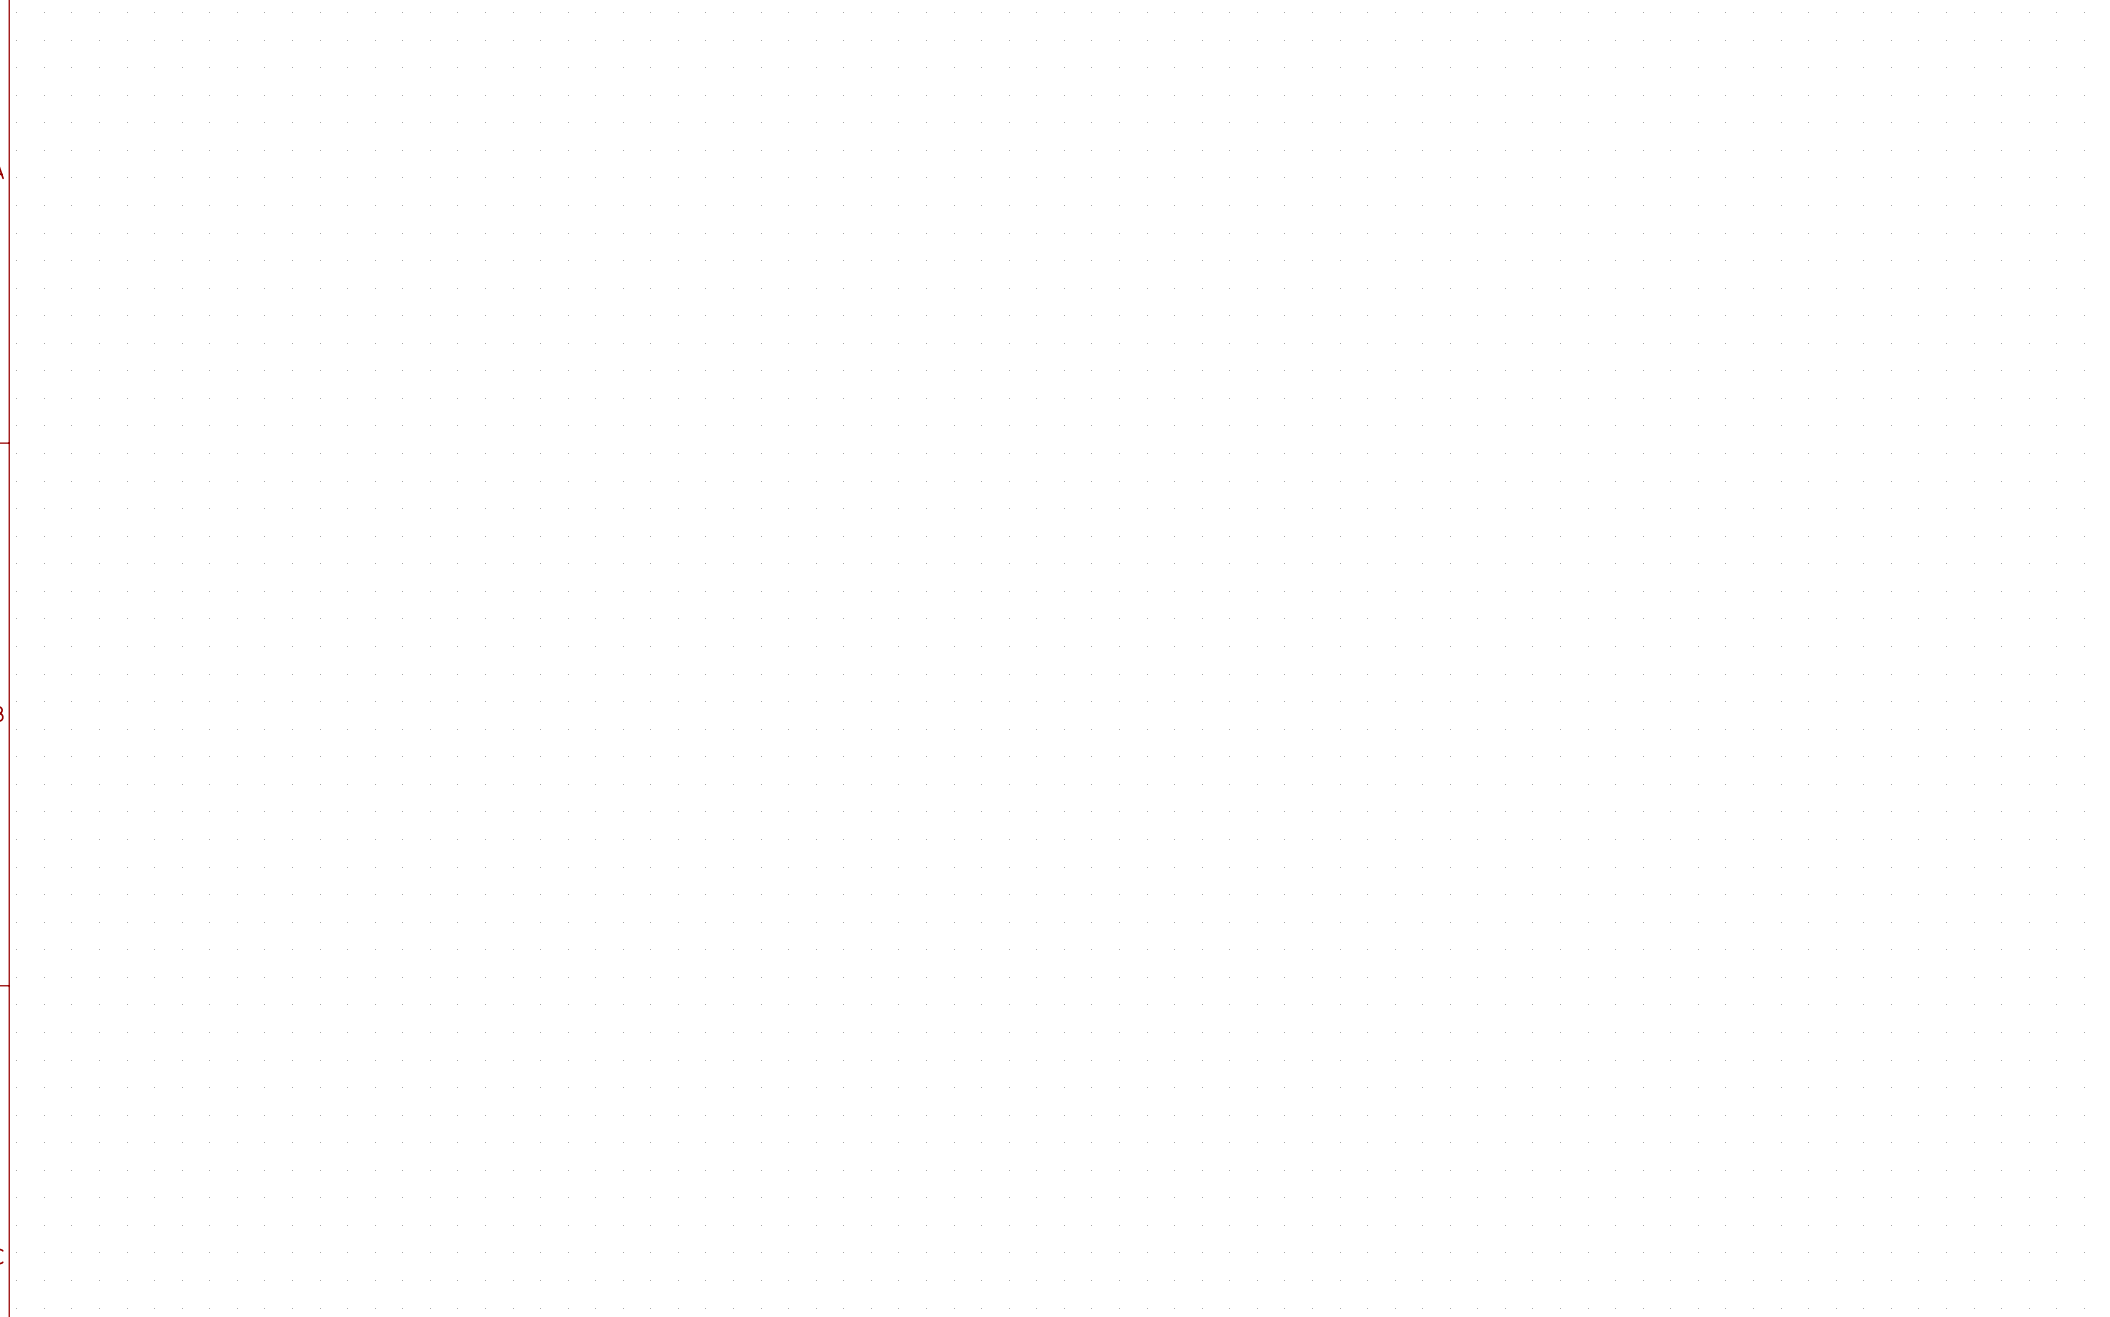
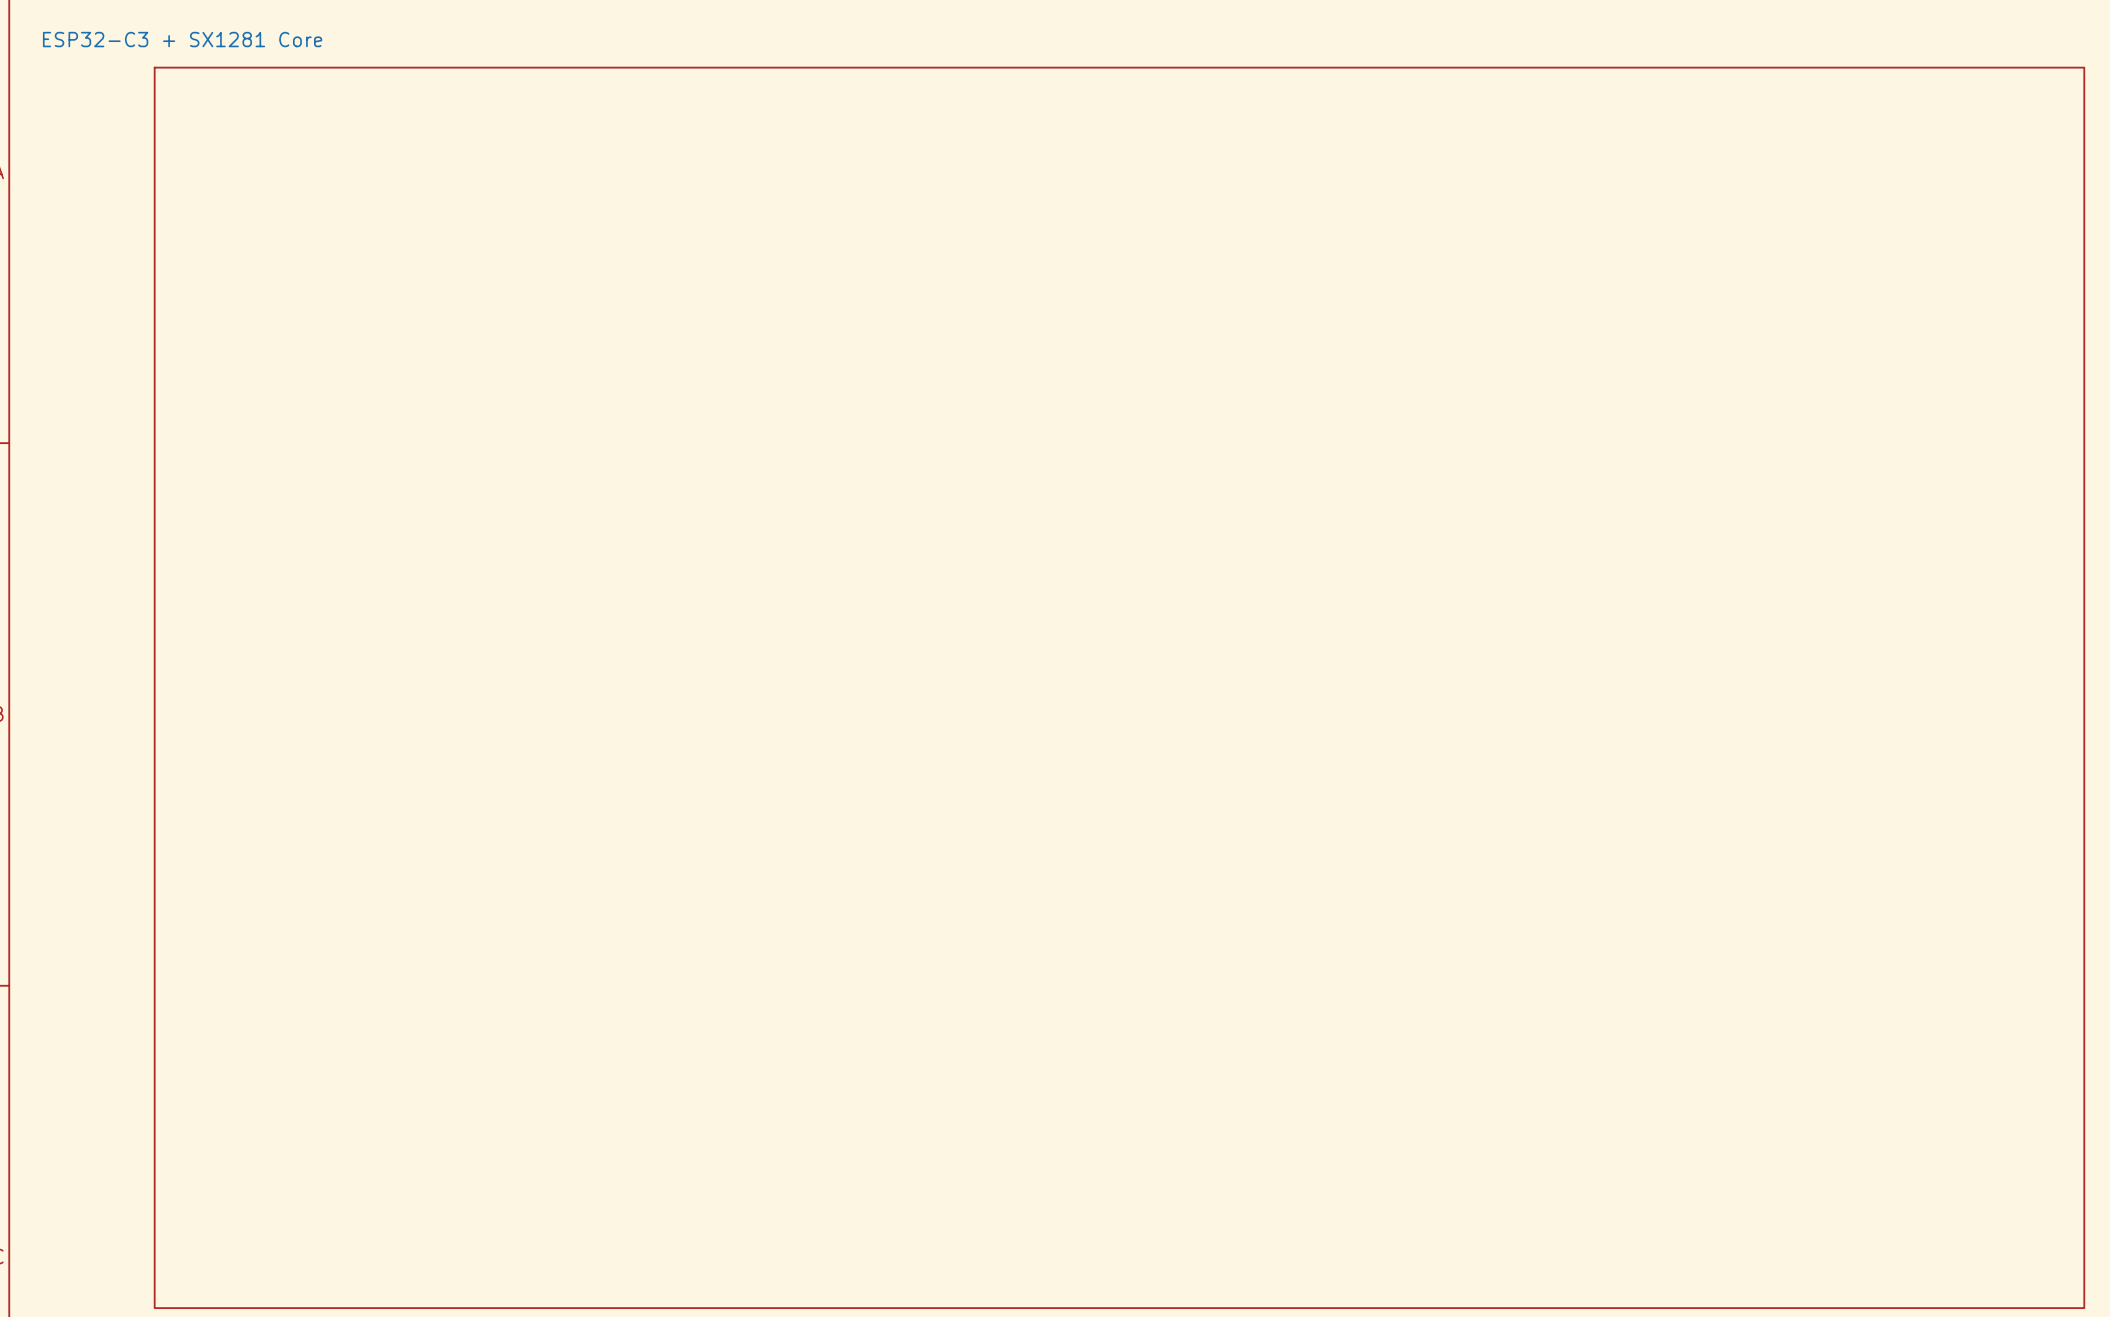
sheet ESP32-C3 + SX1281 Core: none -> (1119, 687)

